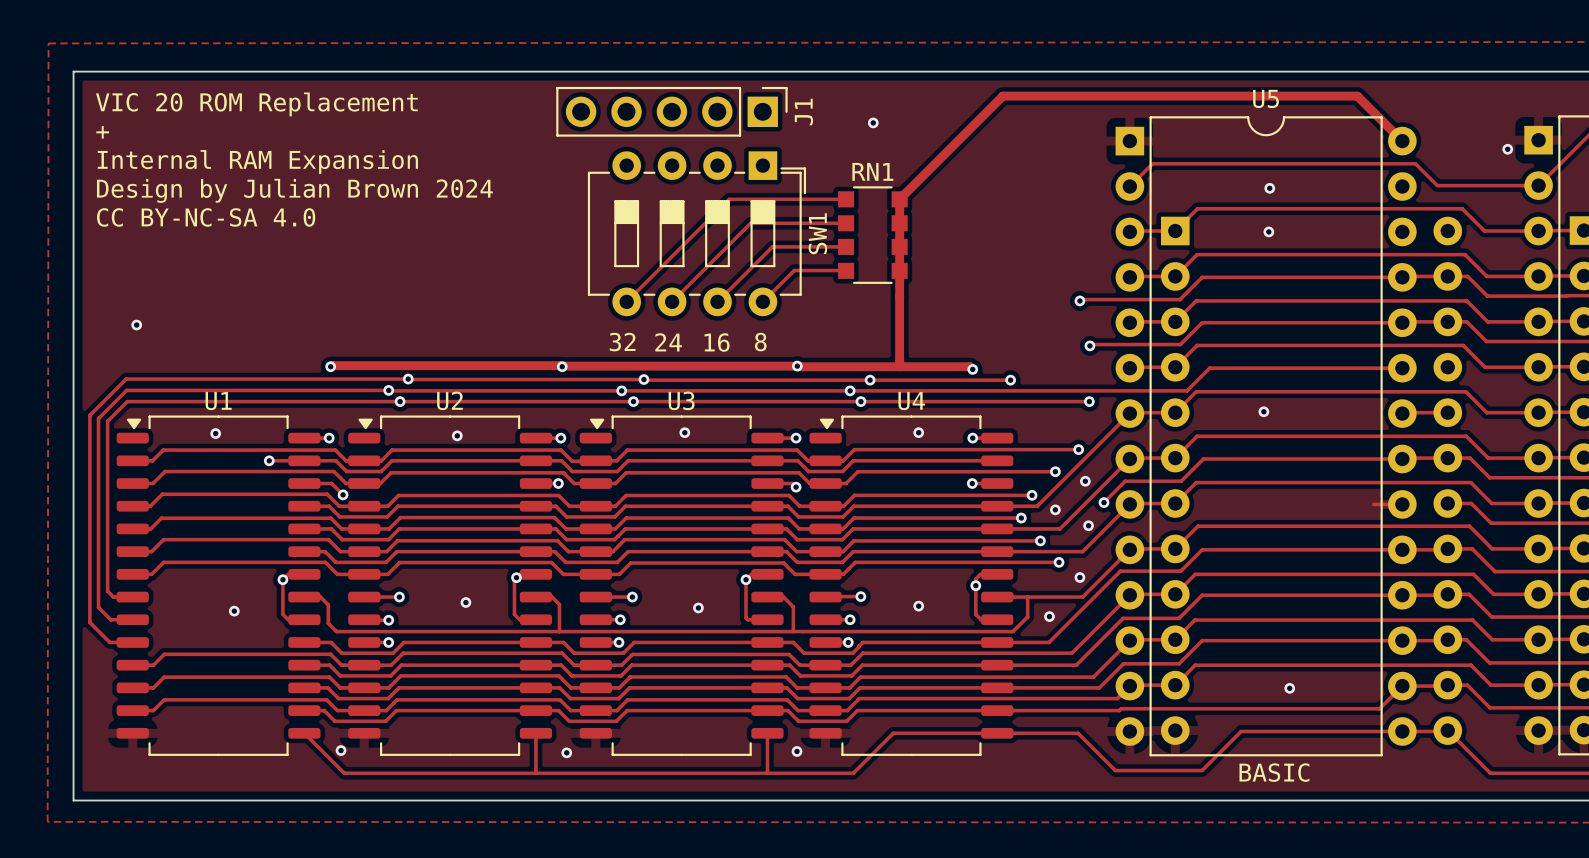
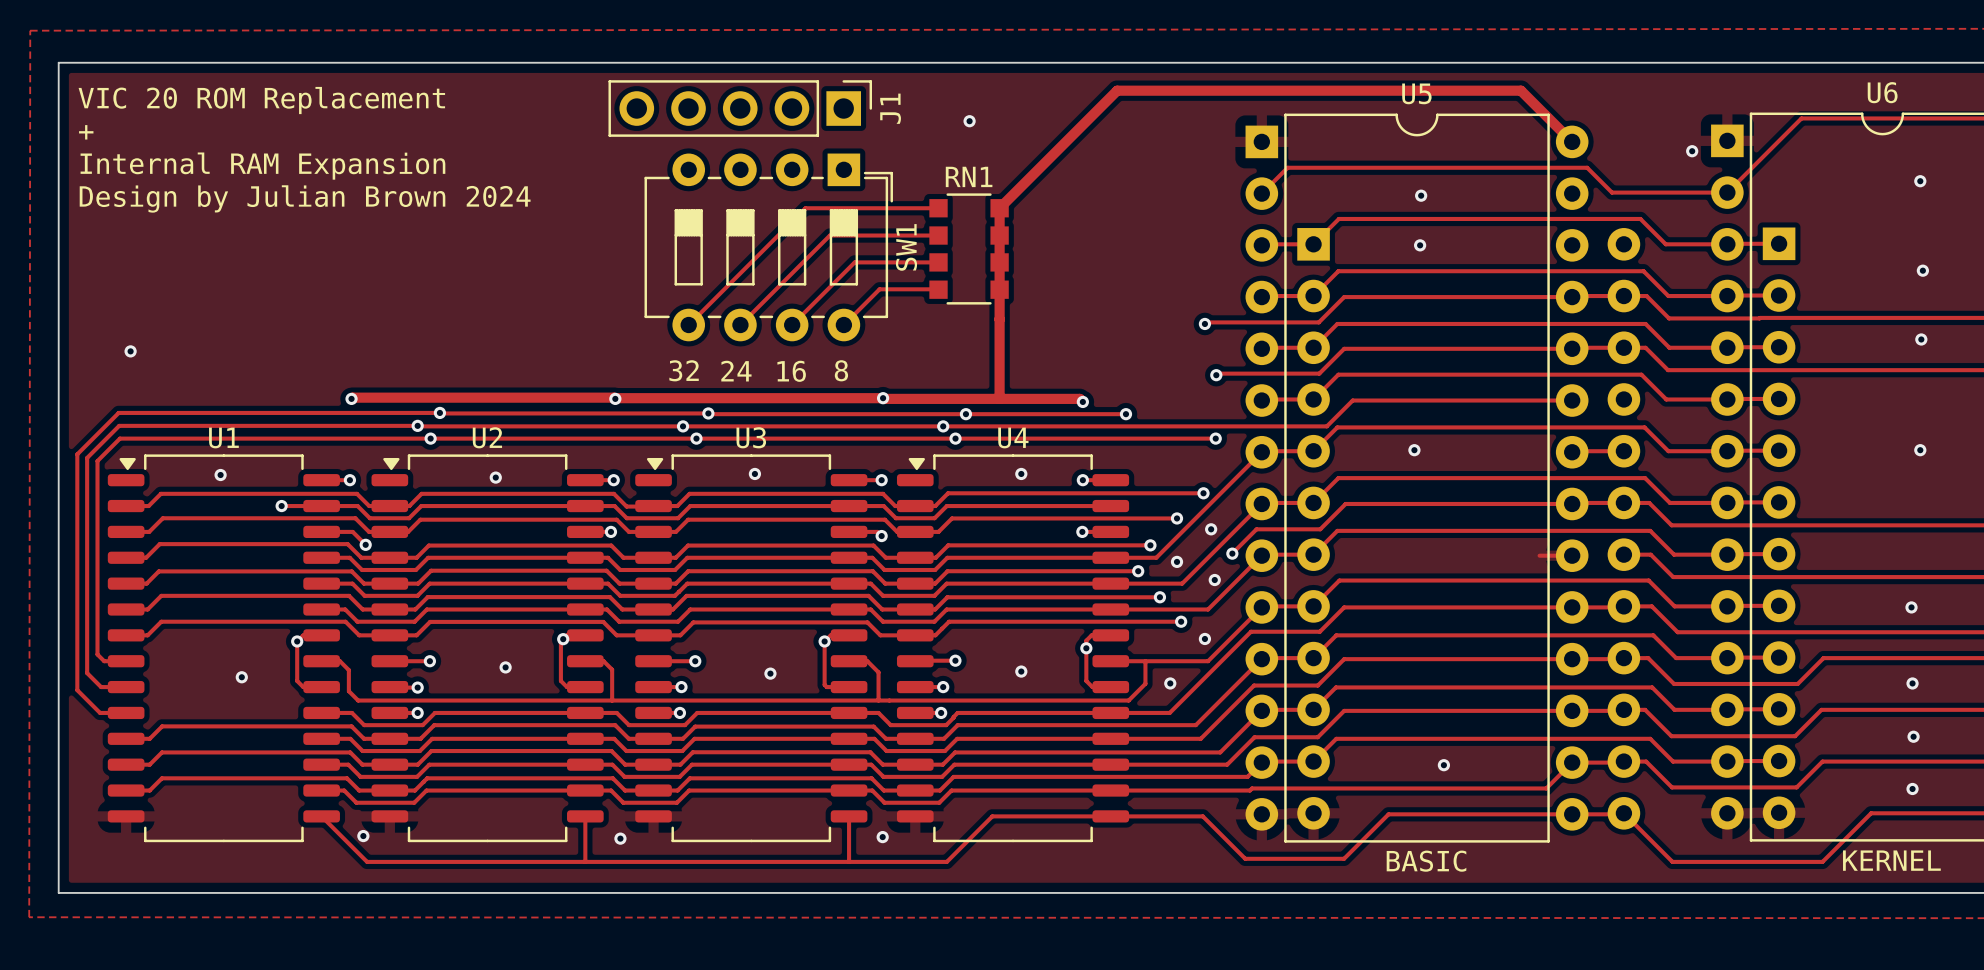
text: VIC 20 ROM Replacement (256, 104) -> none
text: + (102, 132) -> VIC 20 ROM Replacement (261, 100)
text: Internal RAM Expansion (257, 161) -> + (86, 132)
text: Design by Julian Brown 2024 (294, 190) -> Internal RAM Expansion (262, 166)
text: CC BY-NC-SA 4.0 (206, 217) -> Design by Julian Brown 2024 (305, 198)

